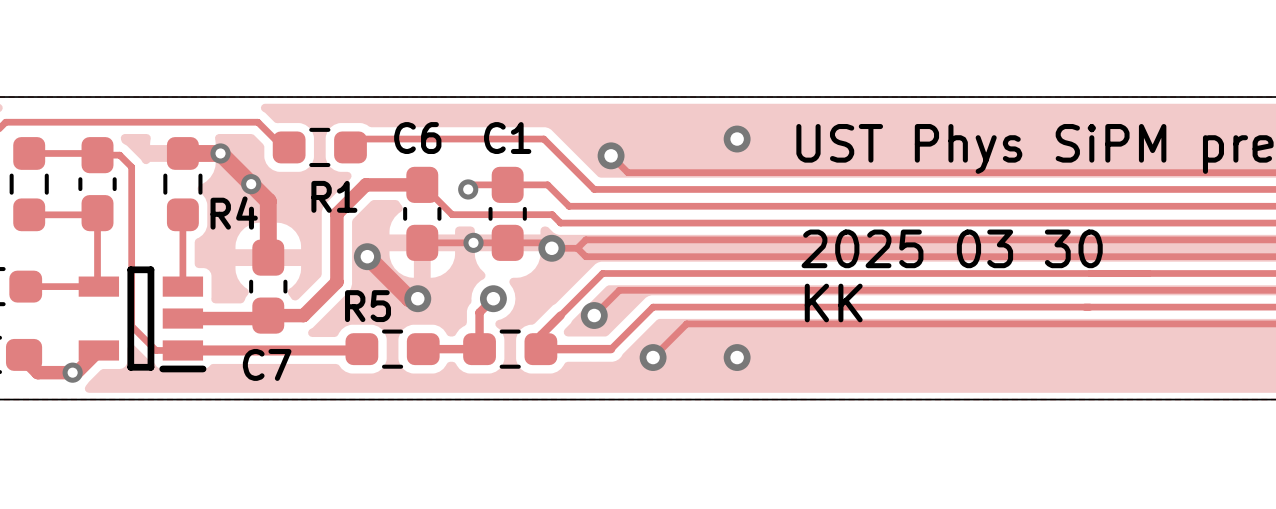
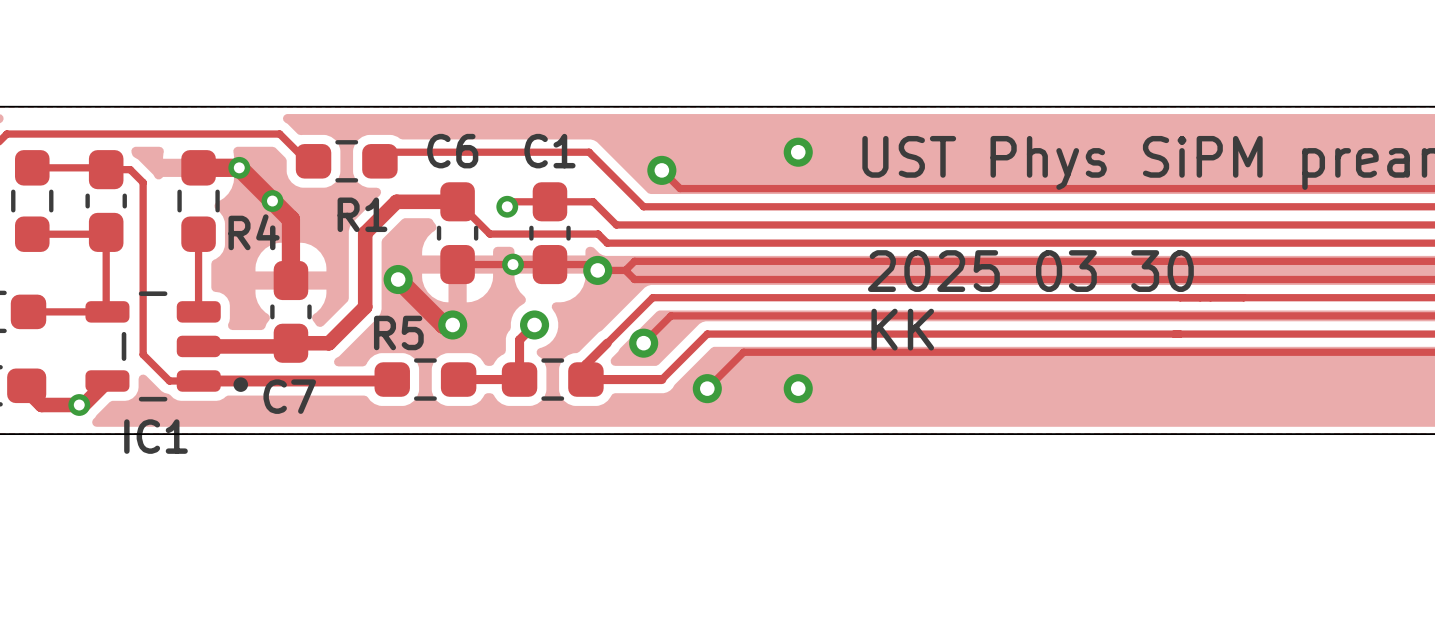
IC1: none -> (166, 346)
part: (142, 319) -> none

